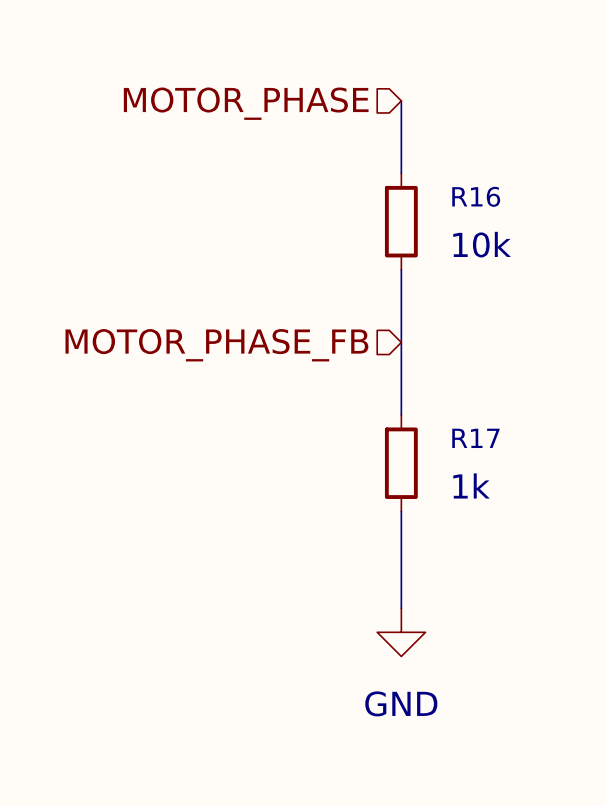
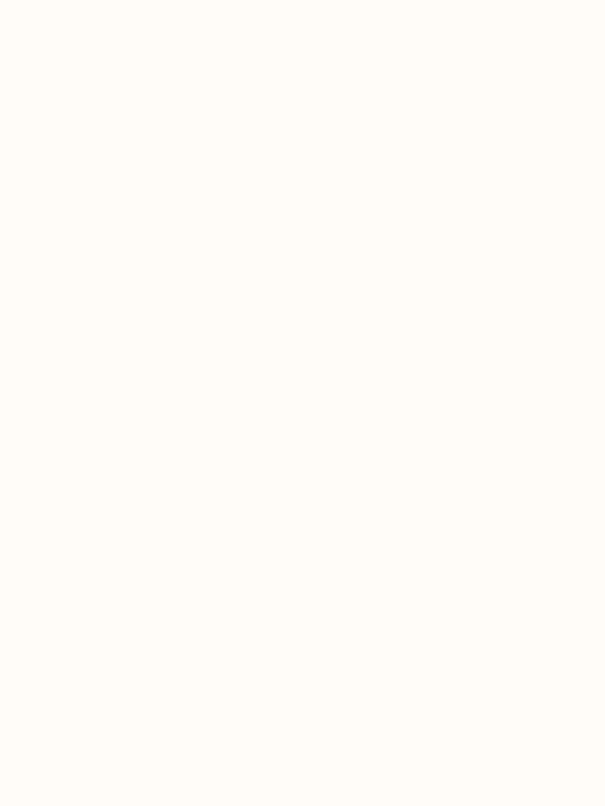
wire: (401, 100) (401, 173) -> none
hierarchical label: MOTOR_PHASE (246, 103) -> none
R16: 10k (401, 221) -> none
wire: (401, 269) (401, 414) -> none
hierarchical label: MOTOR_PHASE_FB (216, 345) -> none
R17: 1k (401, 463) -> none
wire: (401, 511) (401, 608) -> none
power symbol: GND (401, 632) -> none

